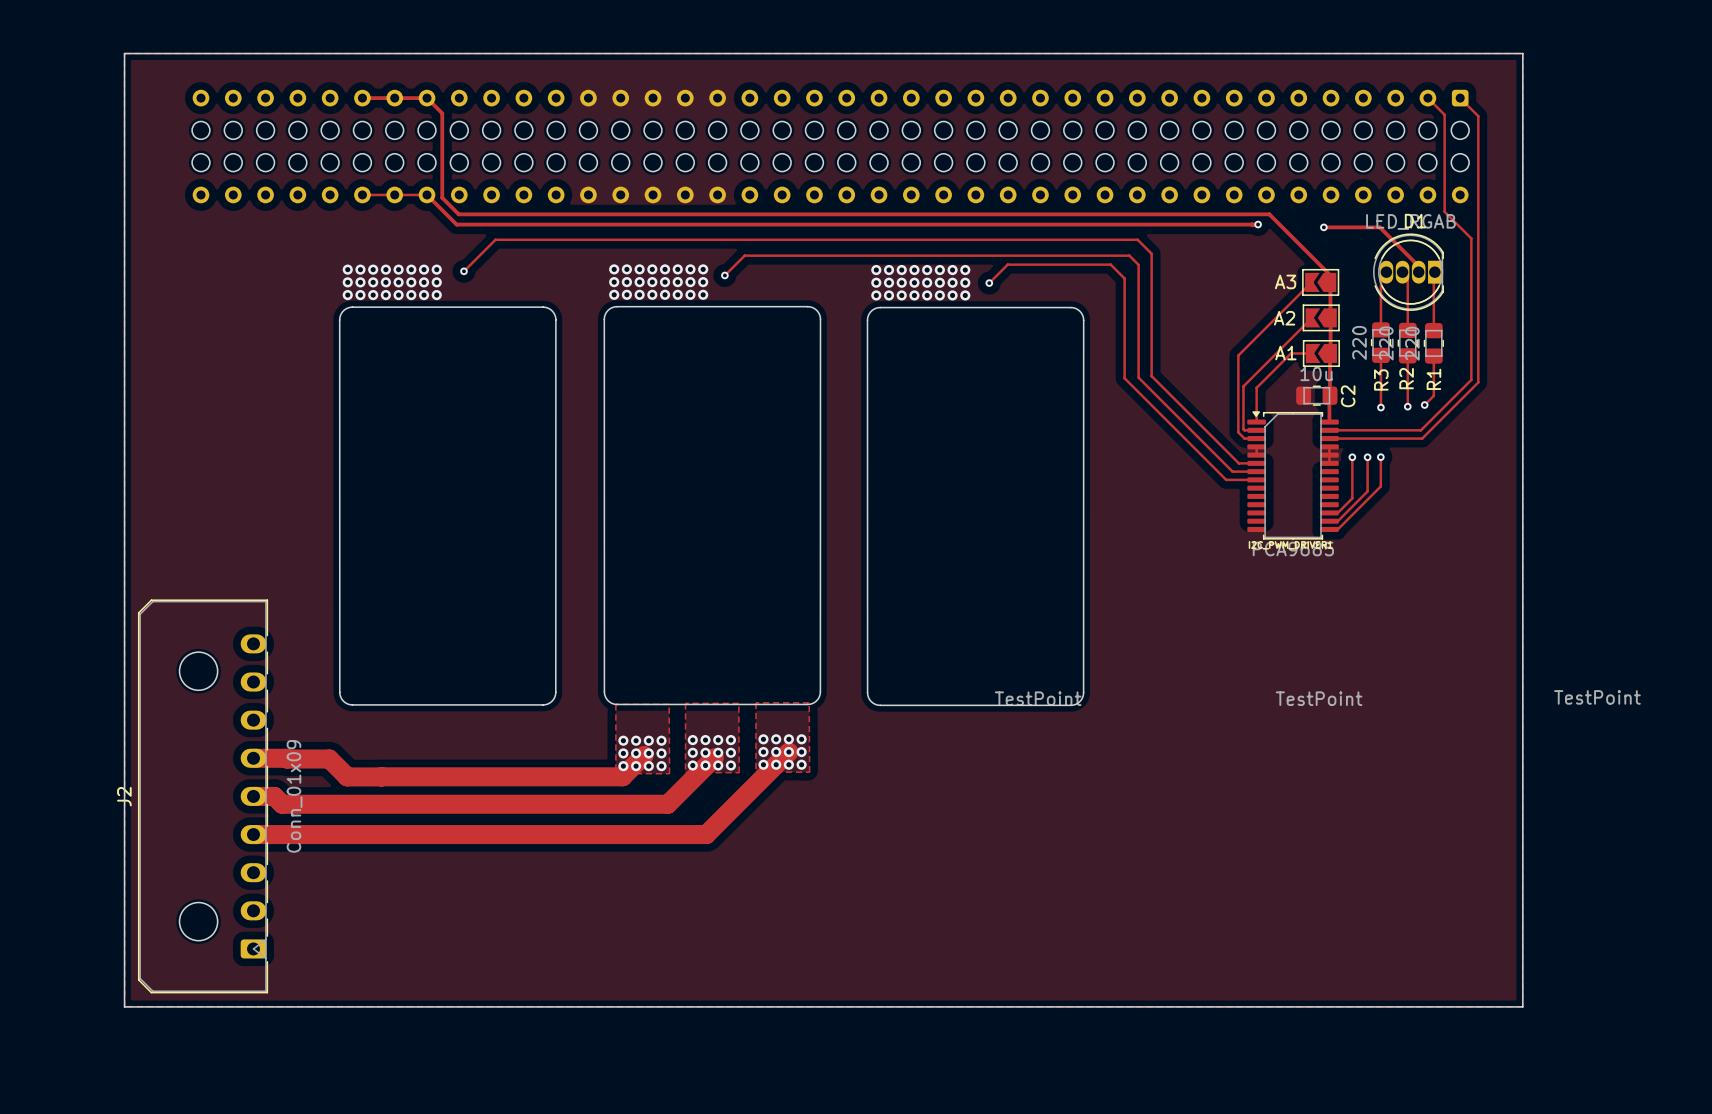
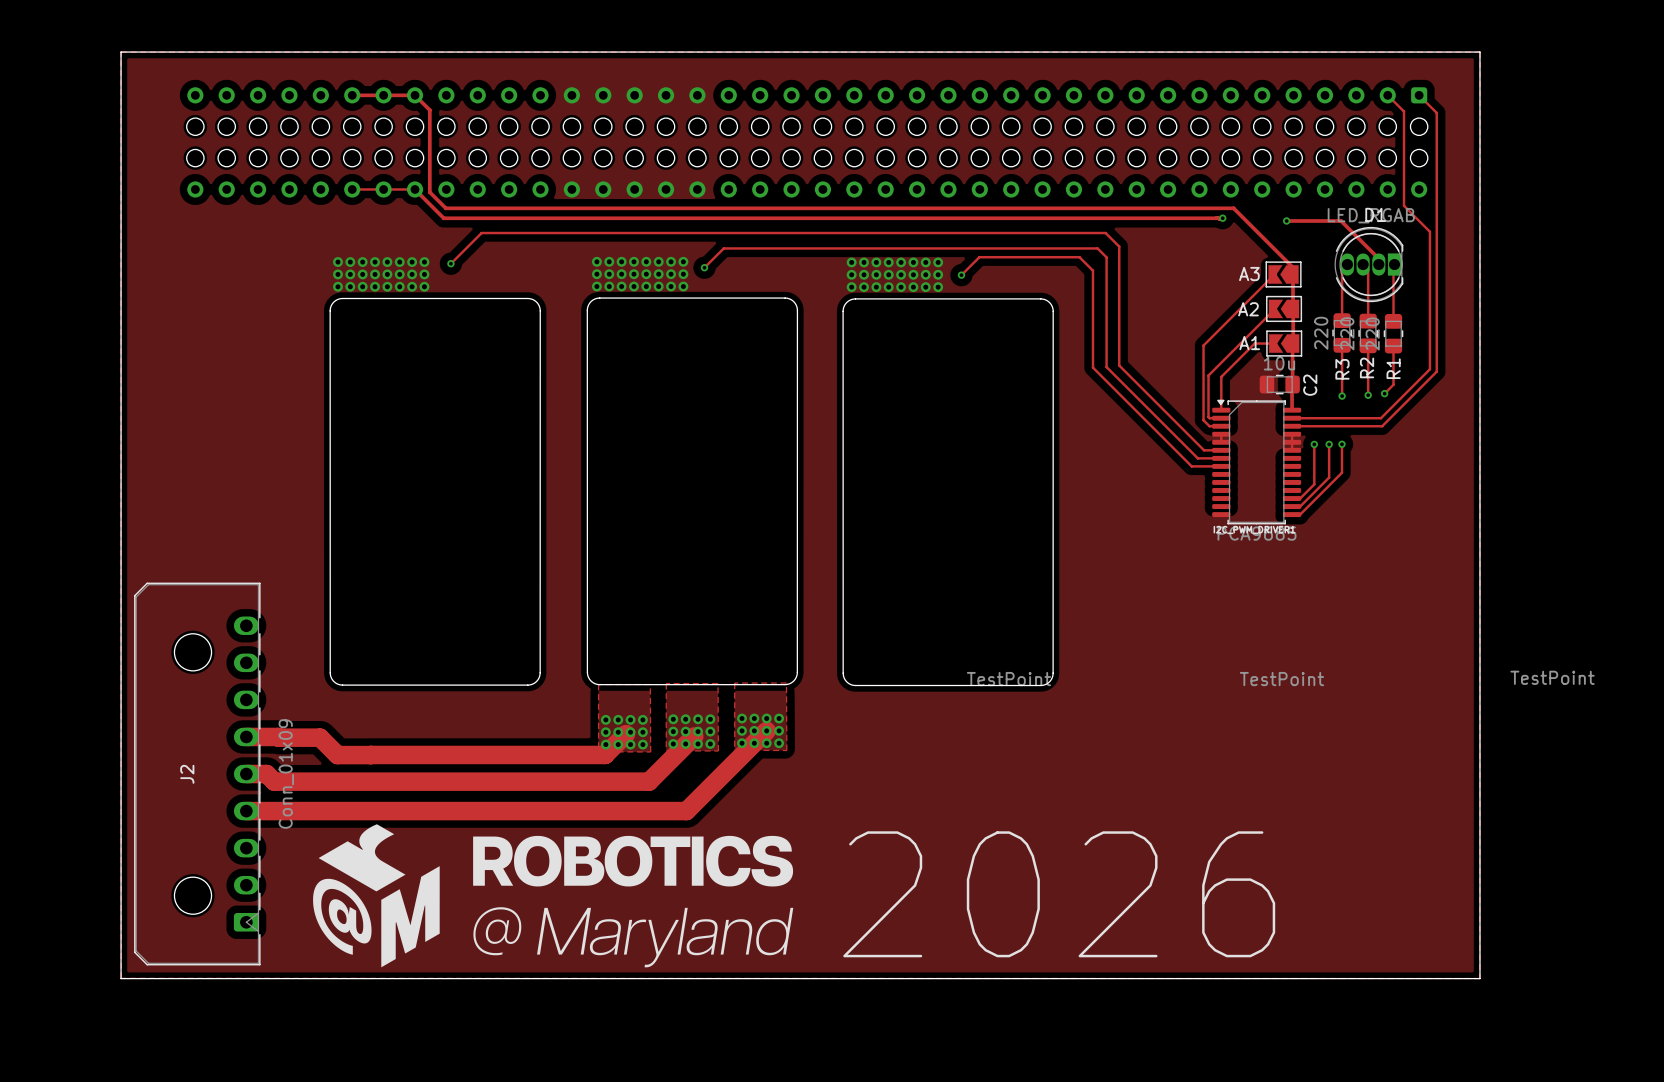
J2 name position: J2 (124, 796) -> J2 (187, 774)
drawing: none -> [313, 824, 794, 968]
text: none -> 2026 (1059, 894)

